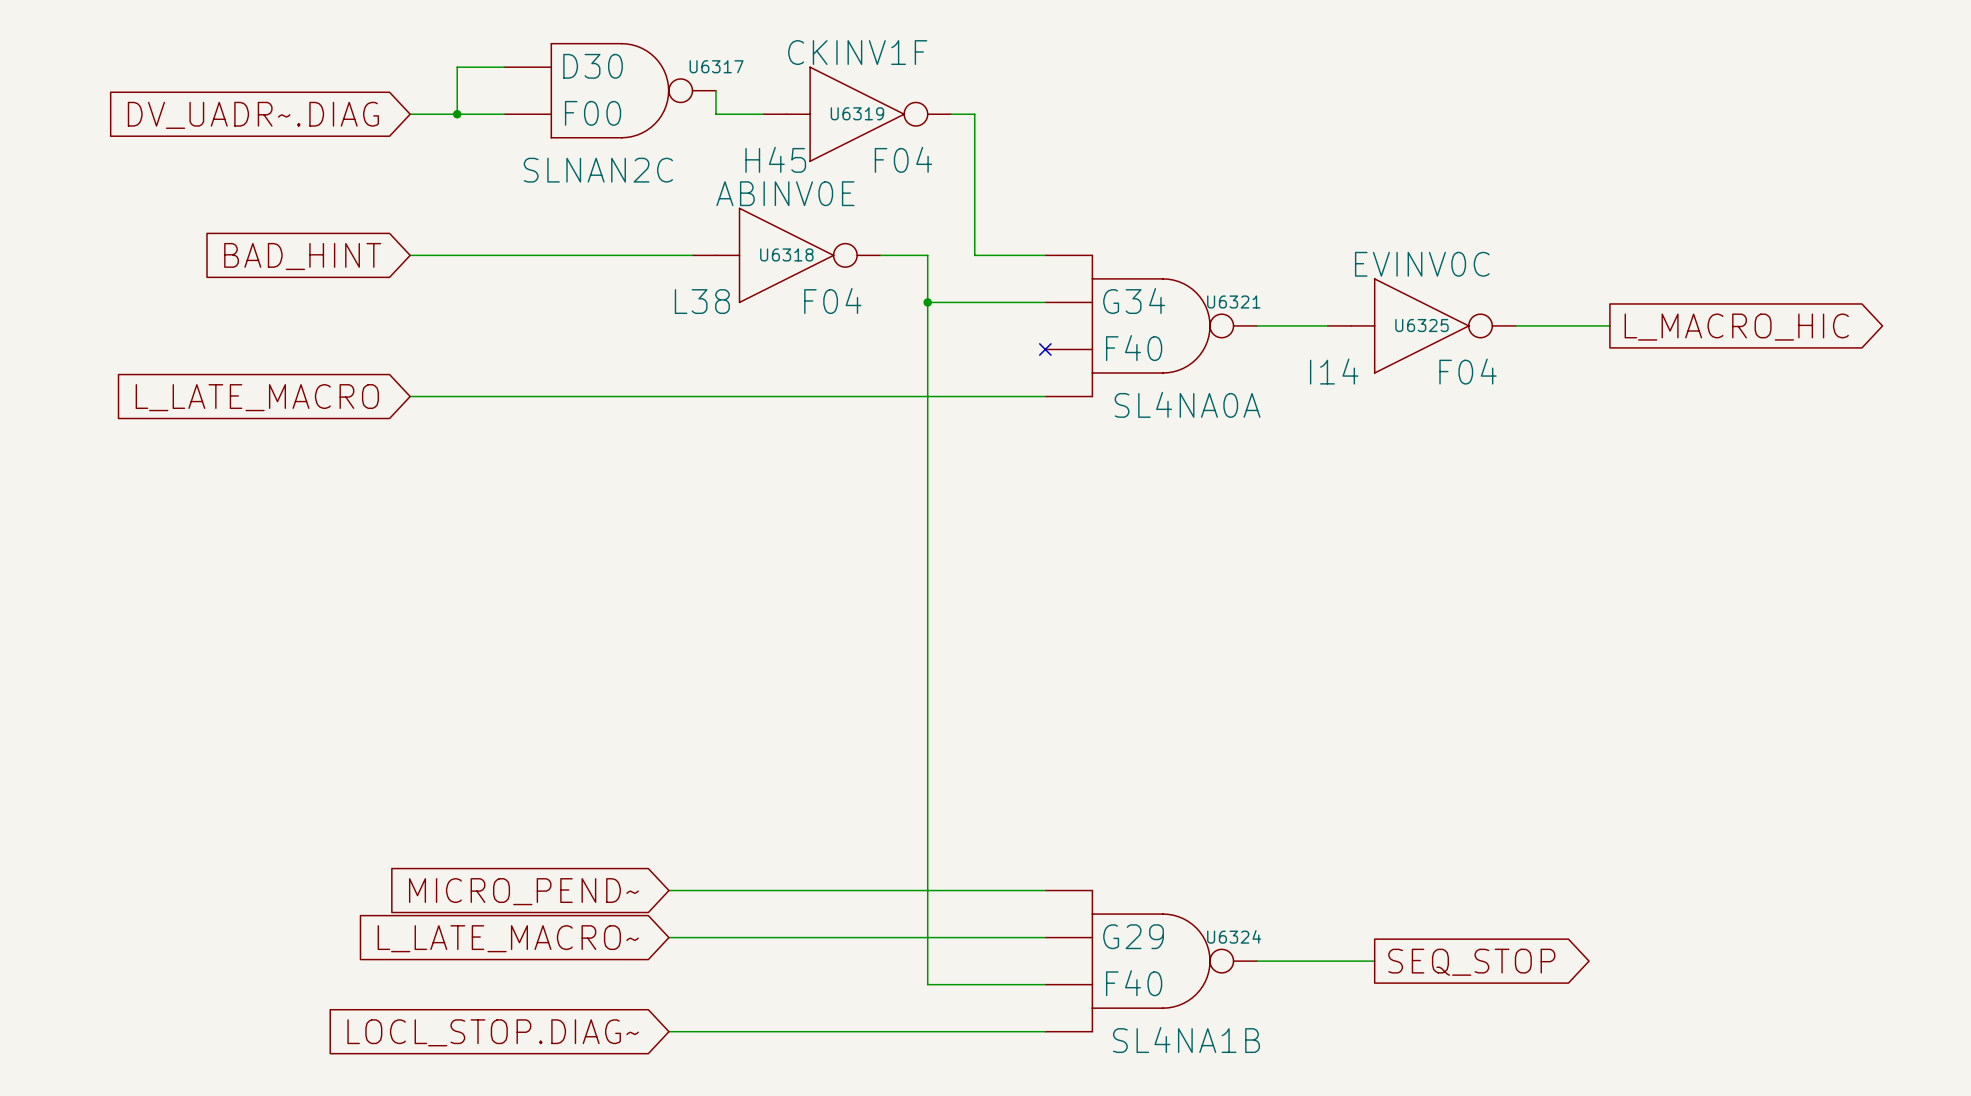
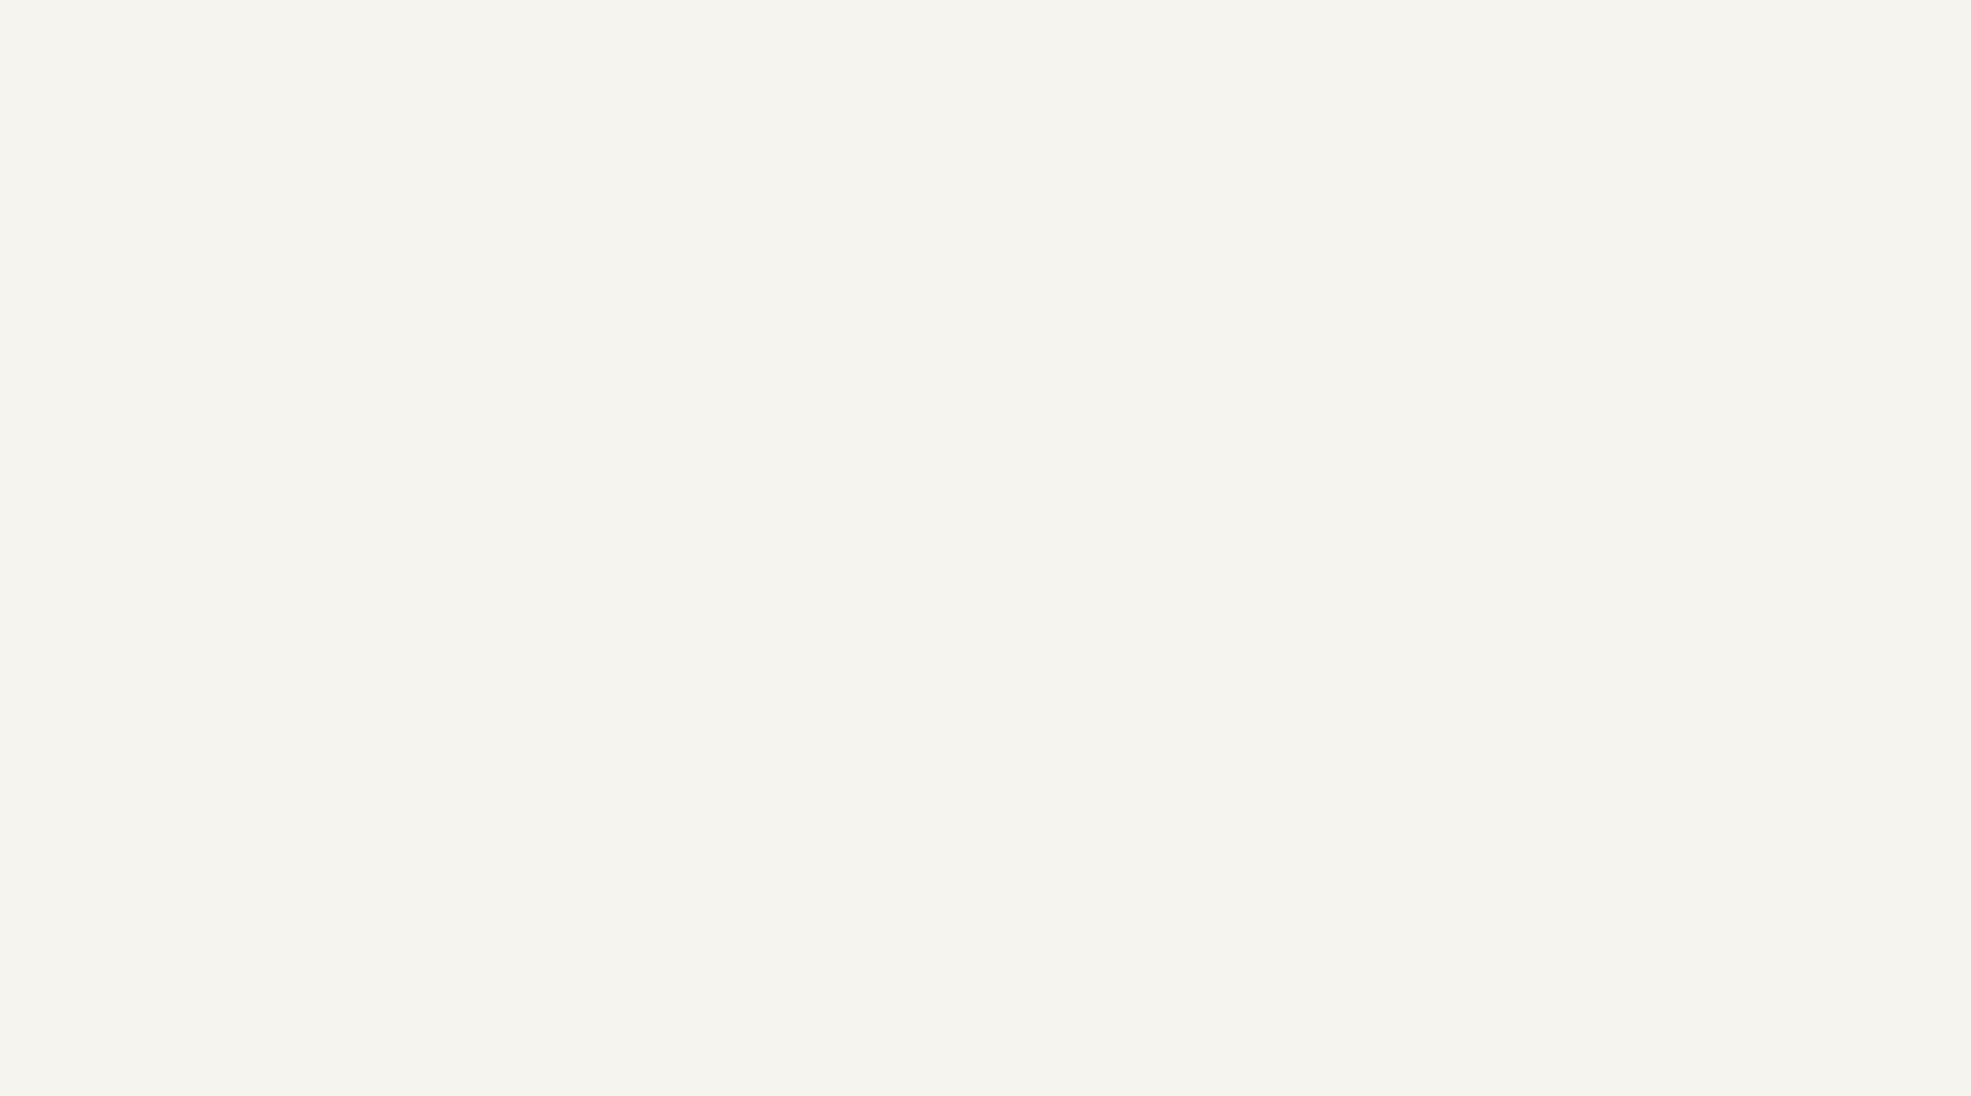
wire: (504, 67) (457, 67) (457, 114) -> none
U6317: F00 (610, 90) -> none
wire: (715, 90) (715, 114) (763, 114) -> none
wire: (410, 114) (504, 114) -> none
junction: (457, 114) -> none
U6319: F04 (857, 114) -> none
wire: (951, 114) (974, 114) (974, 255) (1045, 255) -> none
global label: DV_UADR~.DIAG (253, 115) -> none
wire: (410, 255) (692, 255) -> none
U6318: F04 (786, 255) -> none
wire: (880, 255) (927, 255) (927, 984) (1045, 984) -> none
global label: BAD_HINT (302, 256) -> none
wire: (927, 302) (1045, 302) -> none
junction: (927, 302) -> none
U6321: F40 (1151, 325) -> none
wire: (1257, 325) (1327, 325) -> none
U6325: F04 (1421, 325) -> none
wire: (1515, 325) (1609, 325) -> none
global label: L_MACRO_HIC (1736, 327) -> none
no-connect mark: (1045, 349) -> none
wire: (410, 396) (1045, 396) -> none
global label: L_LATE_MACRO (257, 397) -> none
wire: (668, 890) (1045, 890) -> none
global label: MICRO_PEND~ (523, 891) -> none
wire: (668, 937) (1045, 937) -> none
global label: L_LATE_MACRO~ (508, 938) -> none
U6324: F40 (1151, 961) -> none
wire: (1257, 961) (1374, 961) -> none
global label: SEQ_STOP (1471, 962) -> none
wire: (668, 1031) (1045, 1031) -> none
global label: LOCL_STOP.DIAG~ (493, 1032) -> none

